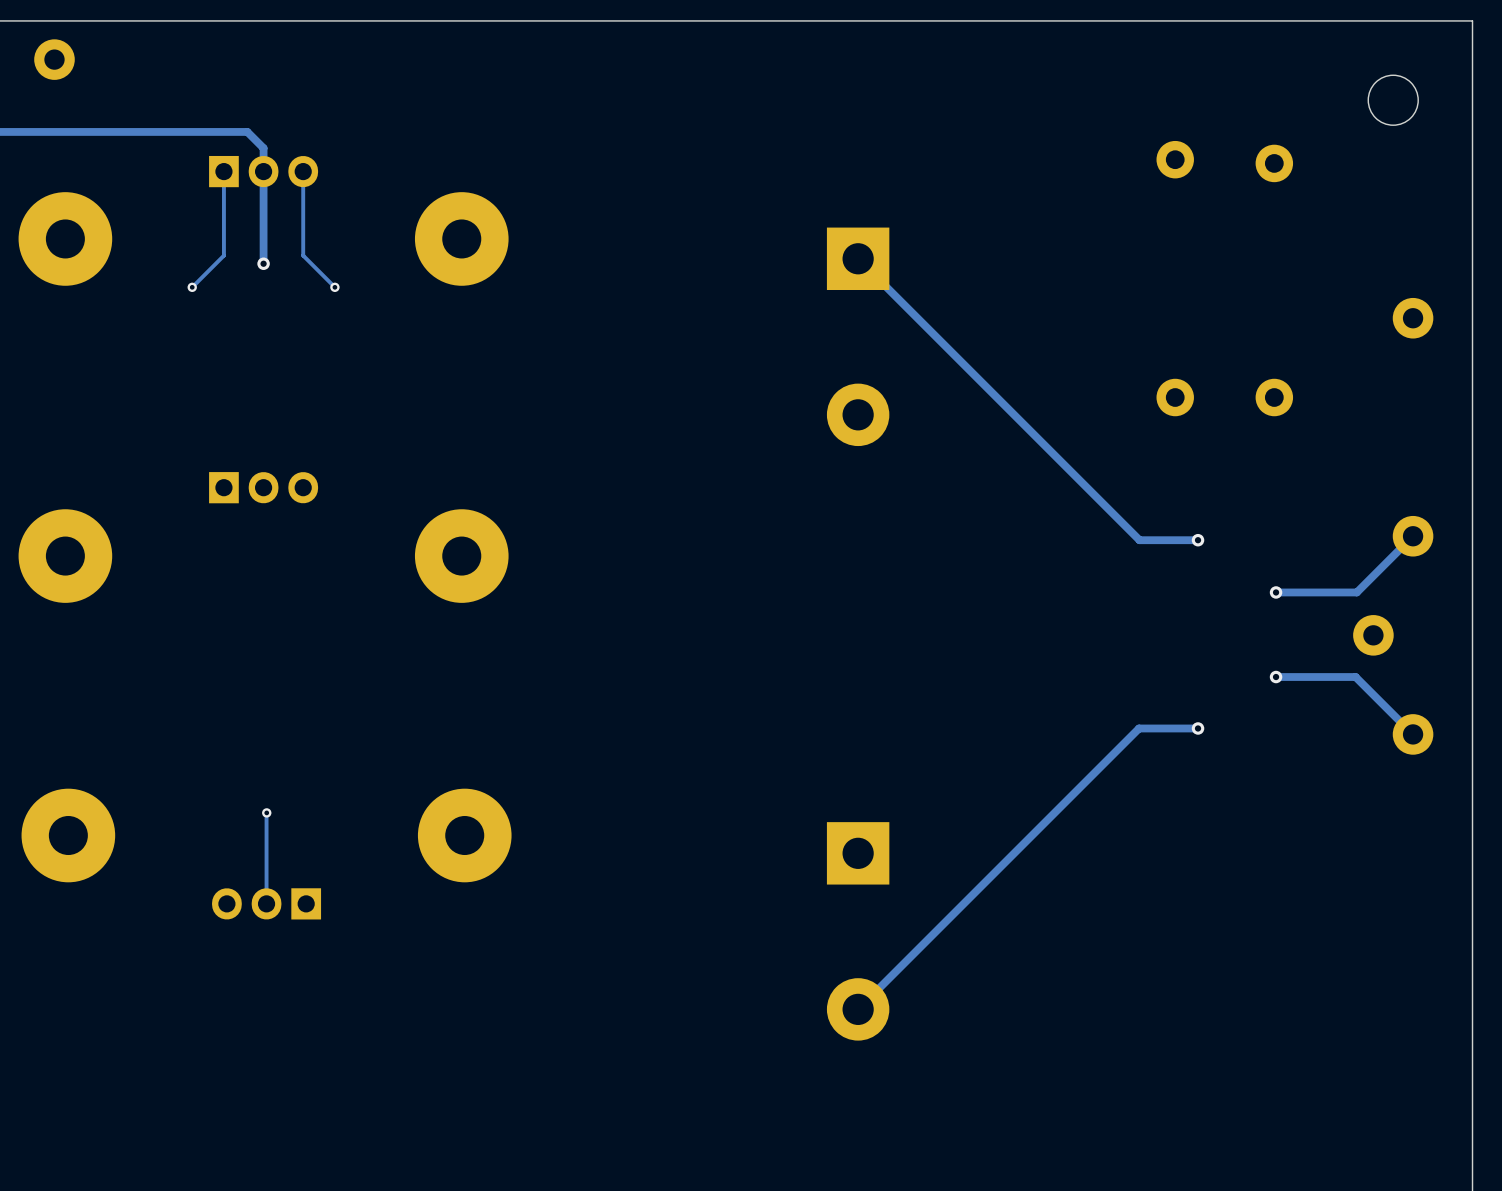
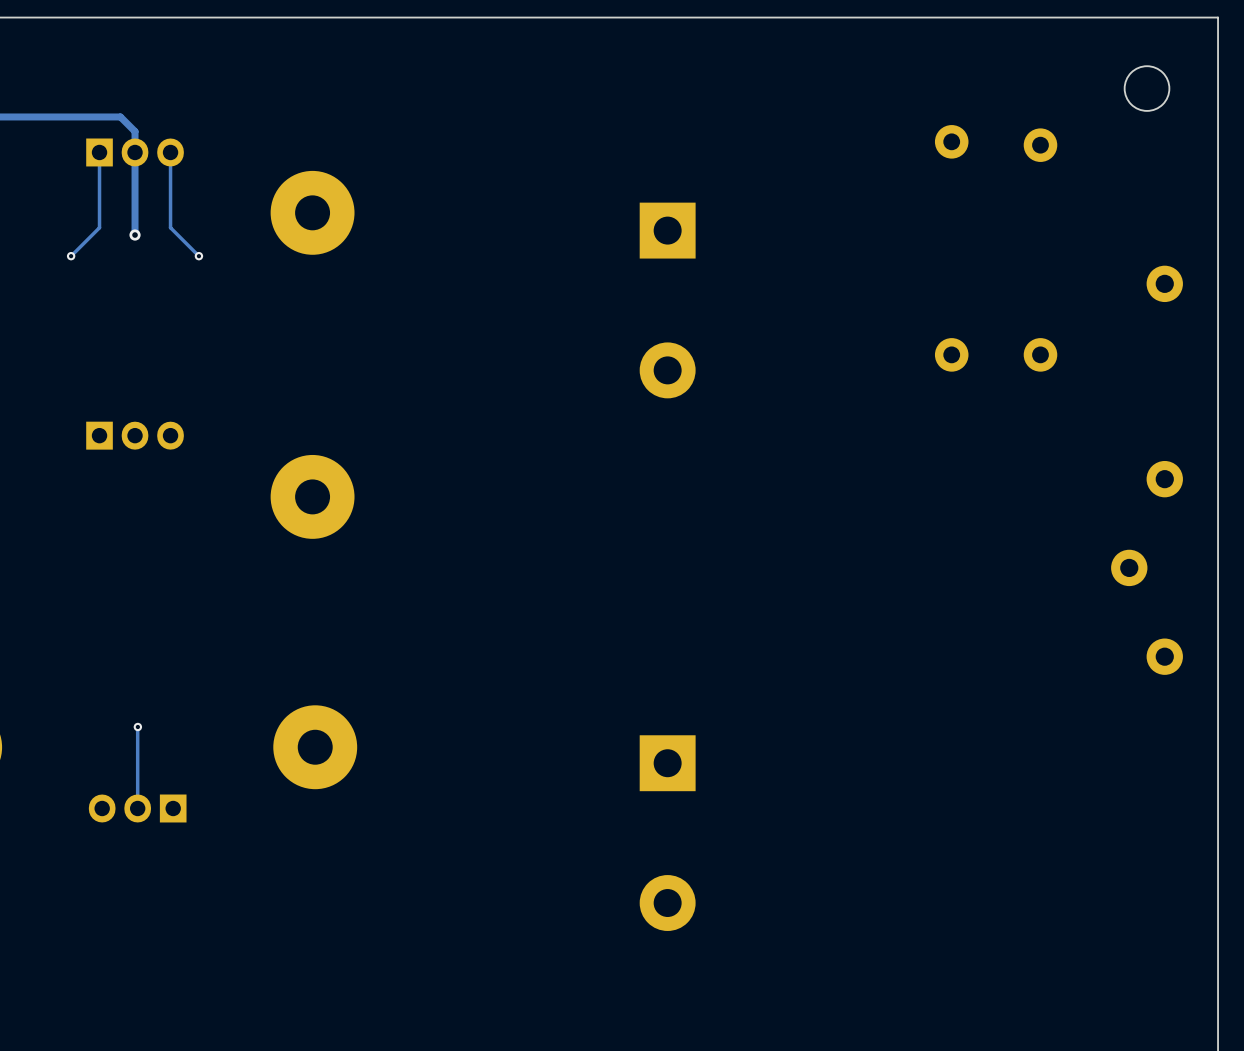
track: (858, 258) (1139, 540) (1198, 540) -> none
track: (1413, 536) (1356, 592) (1276, 592) -> none
via: (1198, 540) -> none
via: (1276, 592) -> none
track: (1276, 677) (1355, 677) (1413, 734) -> none
via: (1276, 677) -> none
track: (1198, 728) (1139, 728) (858, 1009) -> none
via: (1198, 728) -> none

